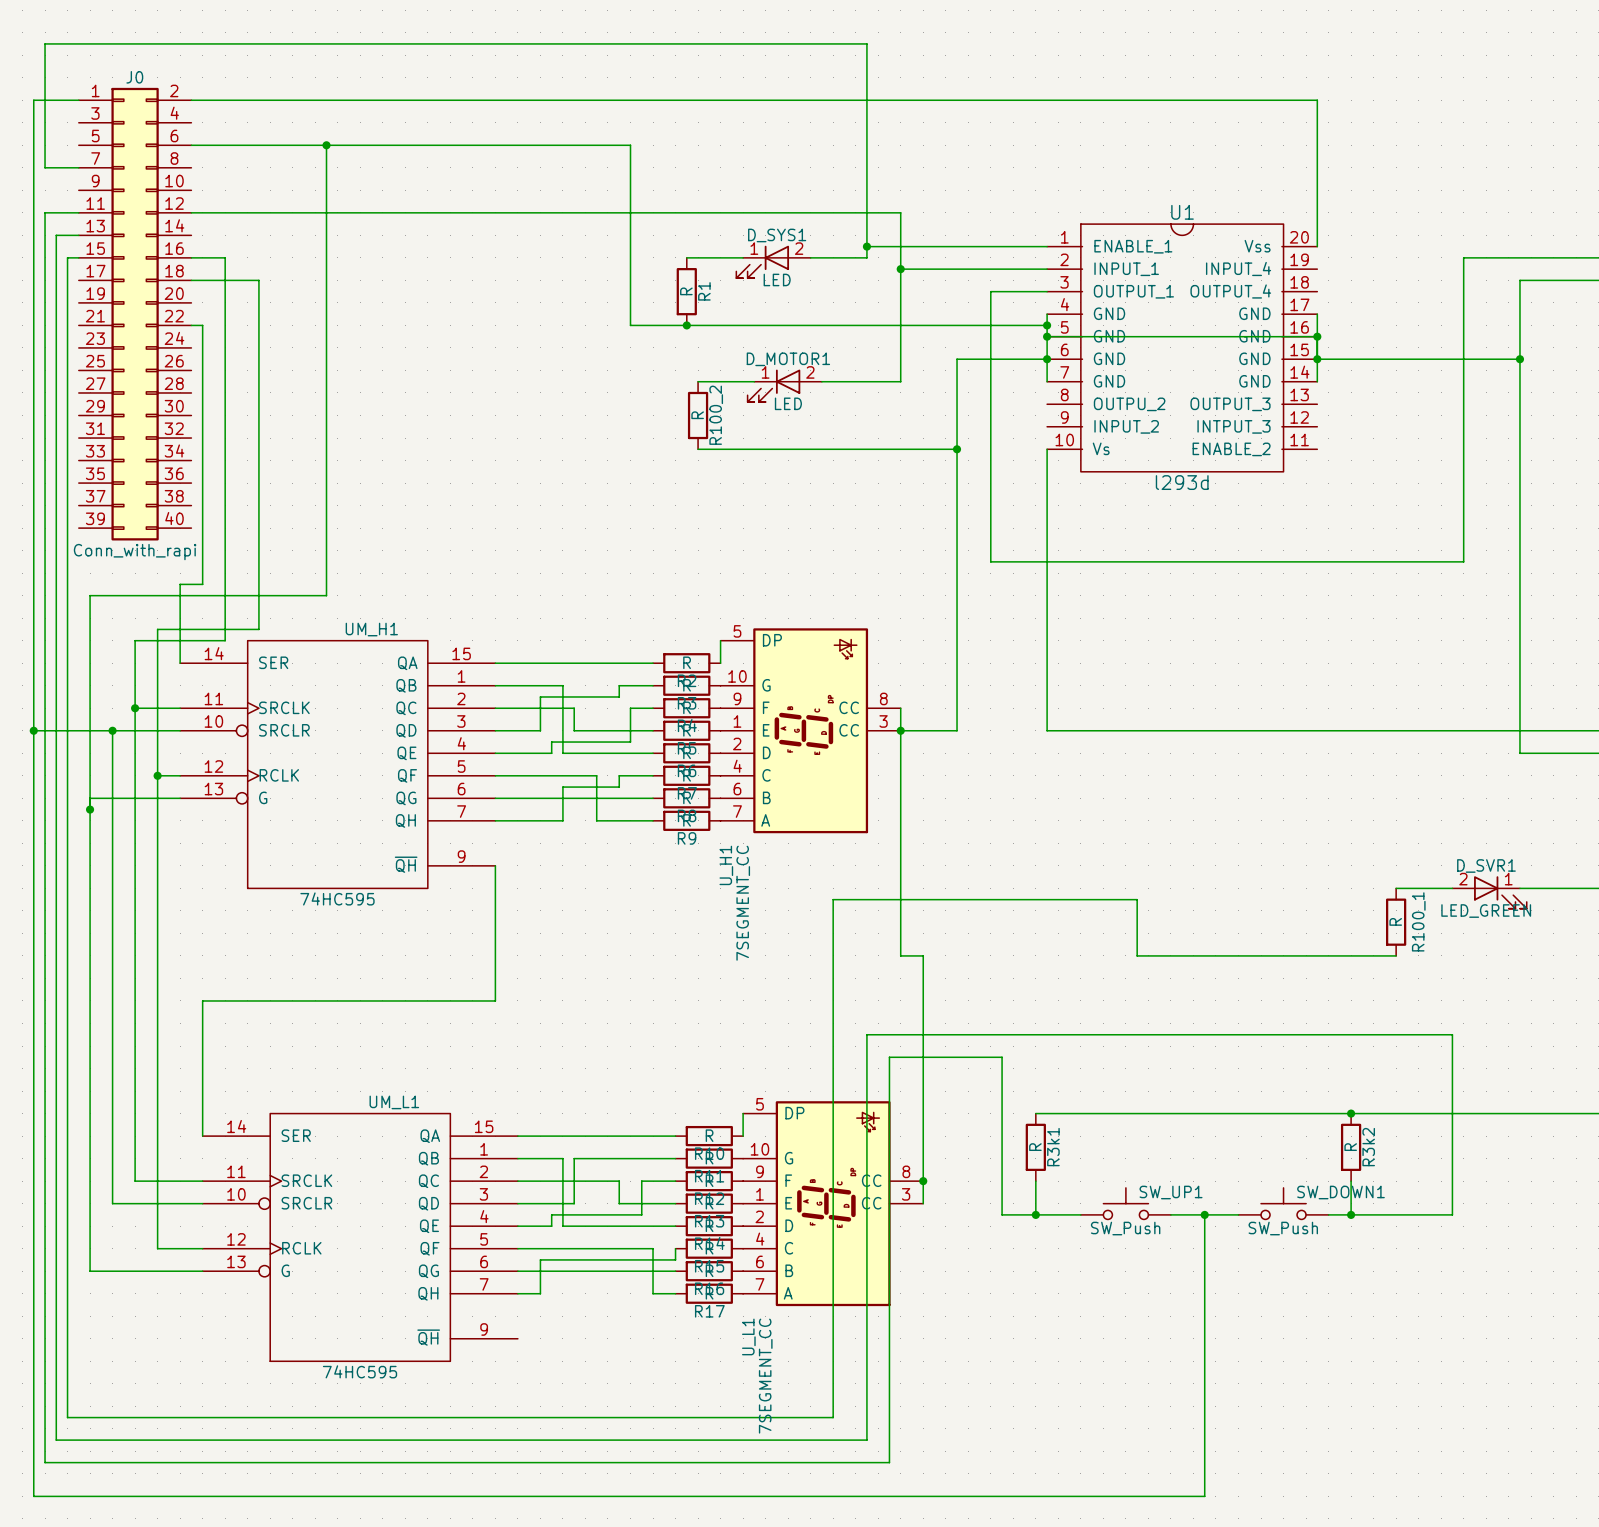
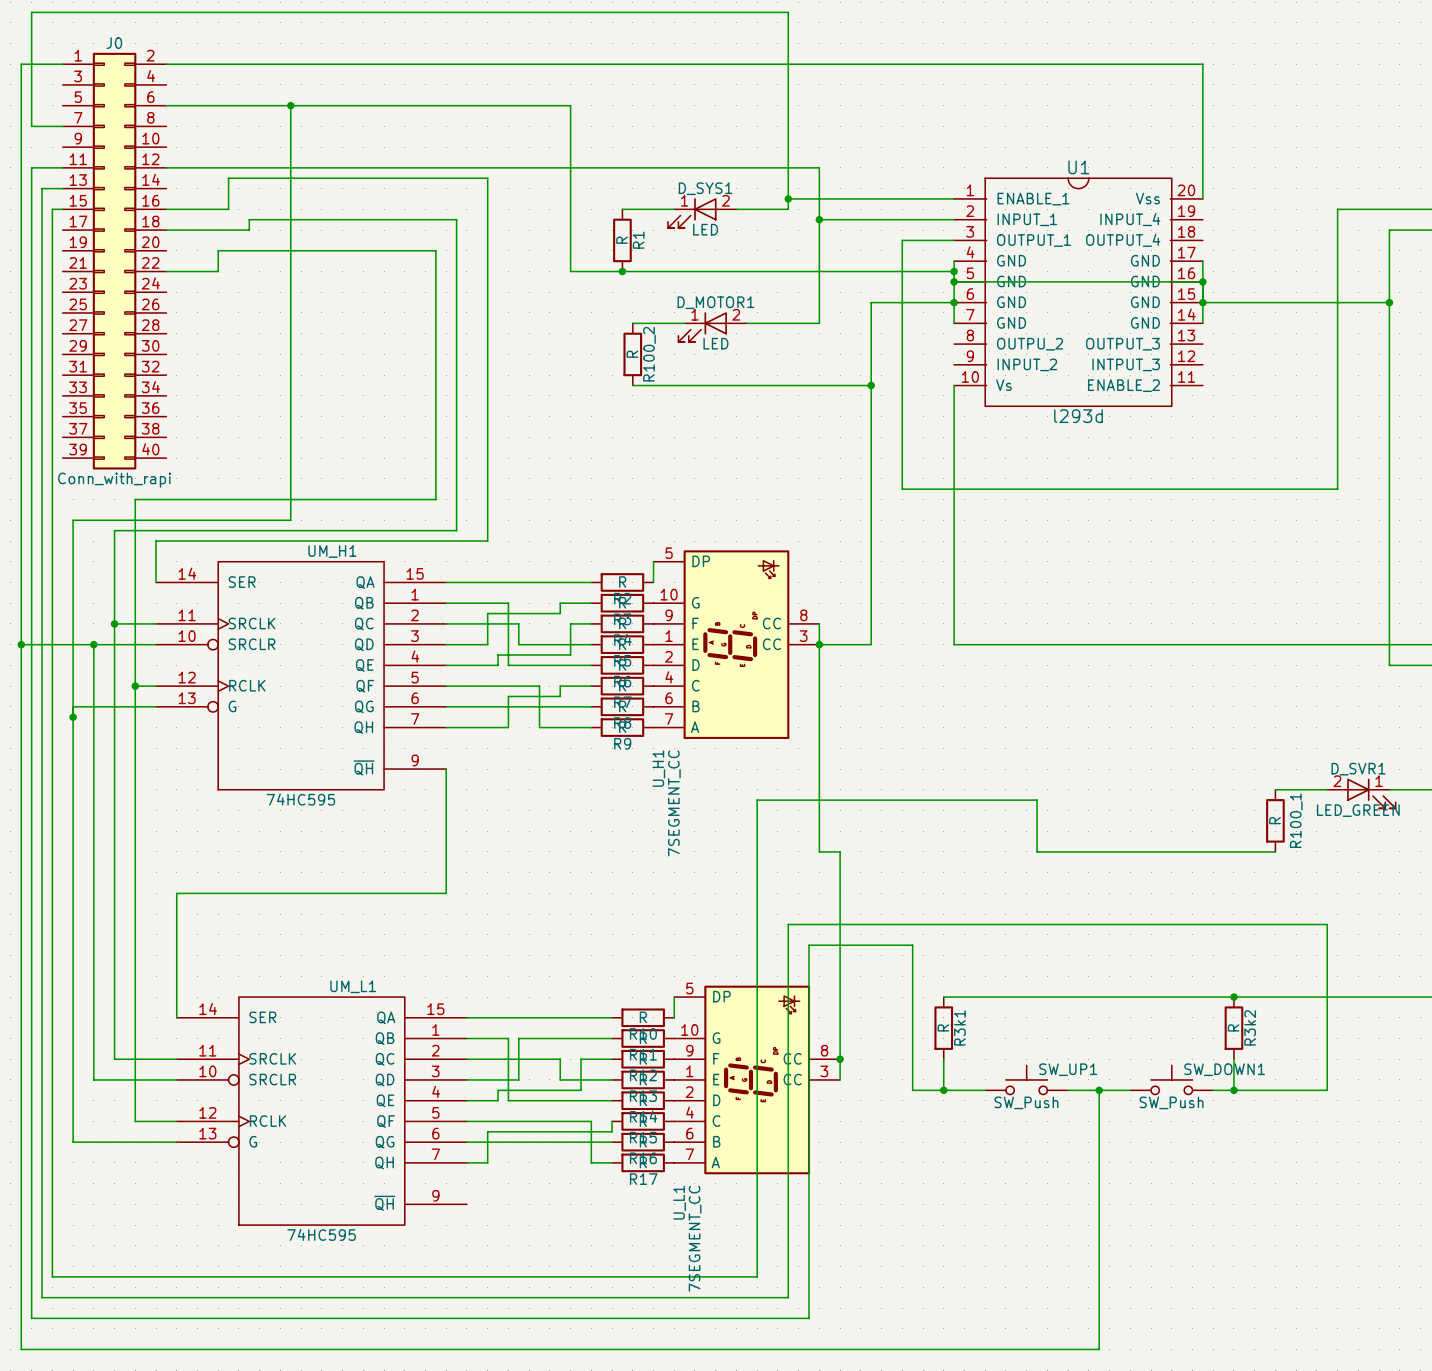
wire: (225, 257) (225, 640) (135, 640) -> (197, 209) (228, 209) (228, 178) (487, 178) (487, 541) (156, 541)
wire: (258, 280) (258, 629) (157, 629) -> (228, 230) (249, 230) (249, 219) (456, 219) (456, 530) (114, 530) (114, 561)
wire: (202, 325) (202, 584) (180, 584) (180, 618) -> (176, 271) (218, 271) (218, 250) (435, 250) (435, 499) (135, 499) (135, 551)

